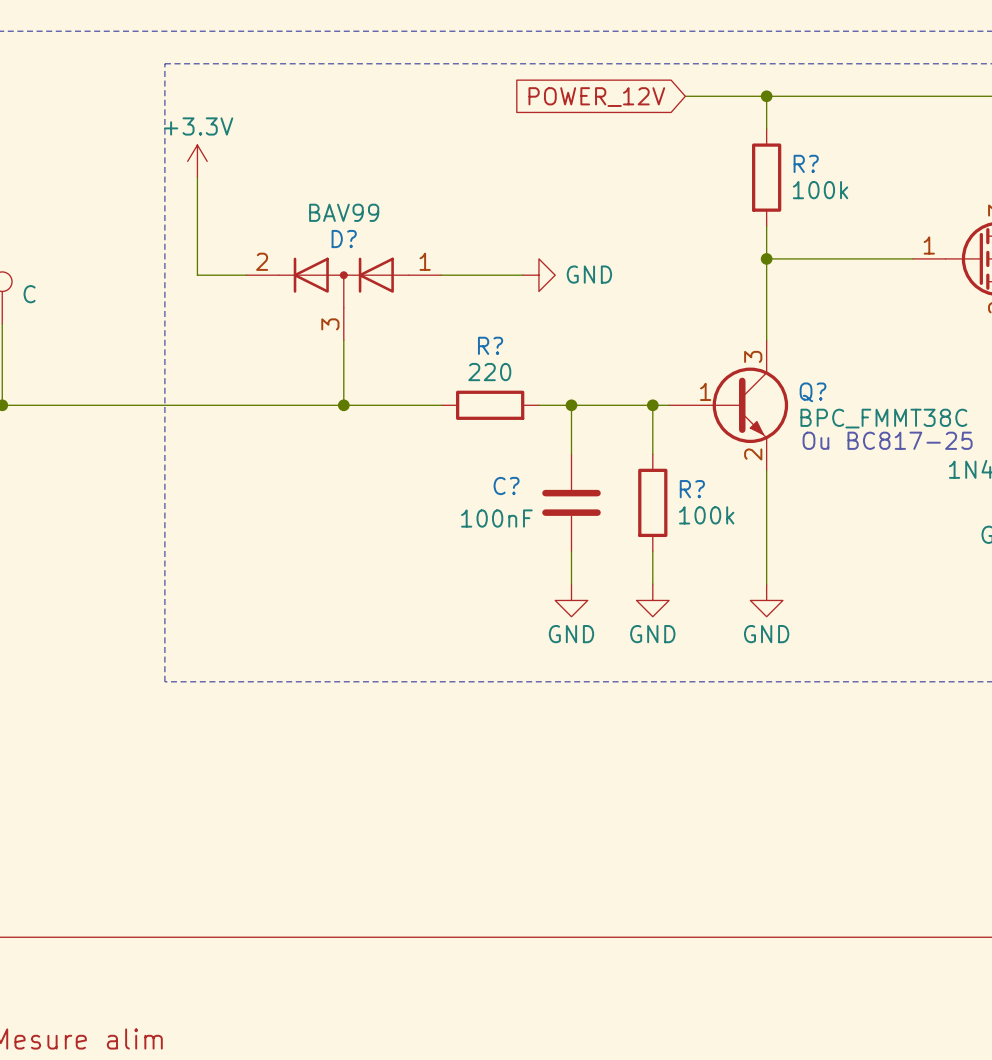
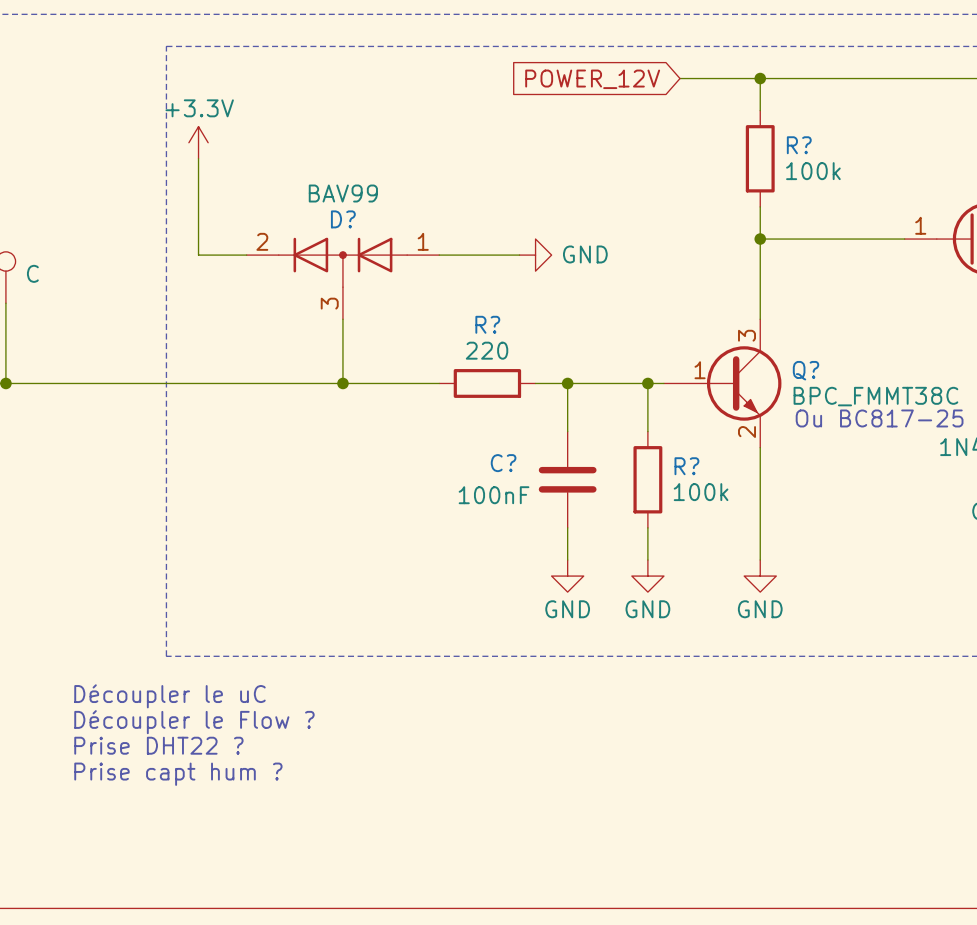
text: none -> Découpler le uC (169, 696)
text: none -> Découpler le Flow ? (194, 722)
text: none -> Prise DHT22 ? (158, 745)
text: none -> Prise capt hum ? (178, 774)

